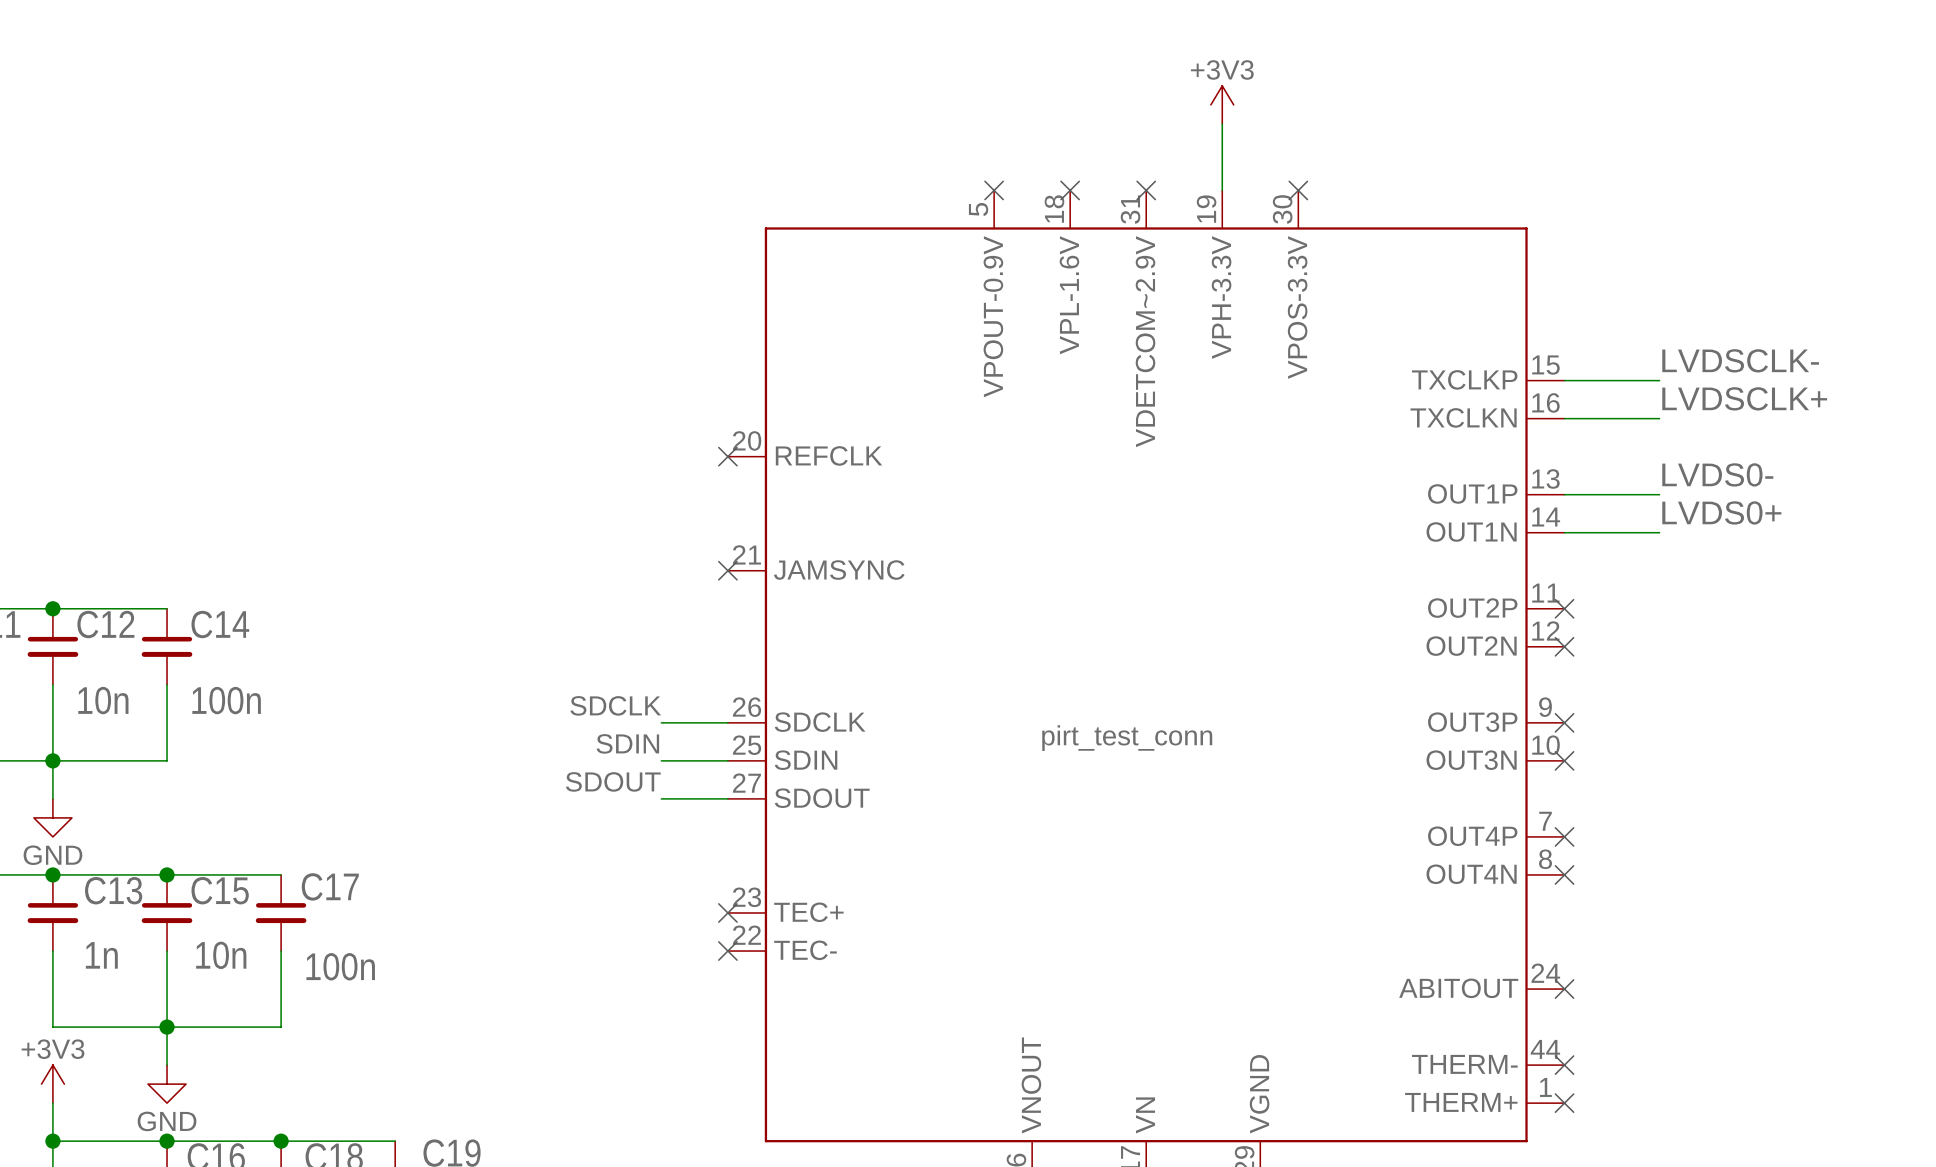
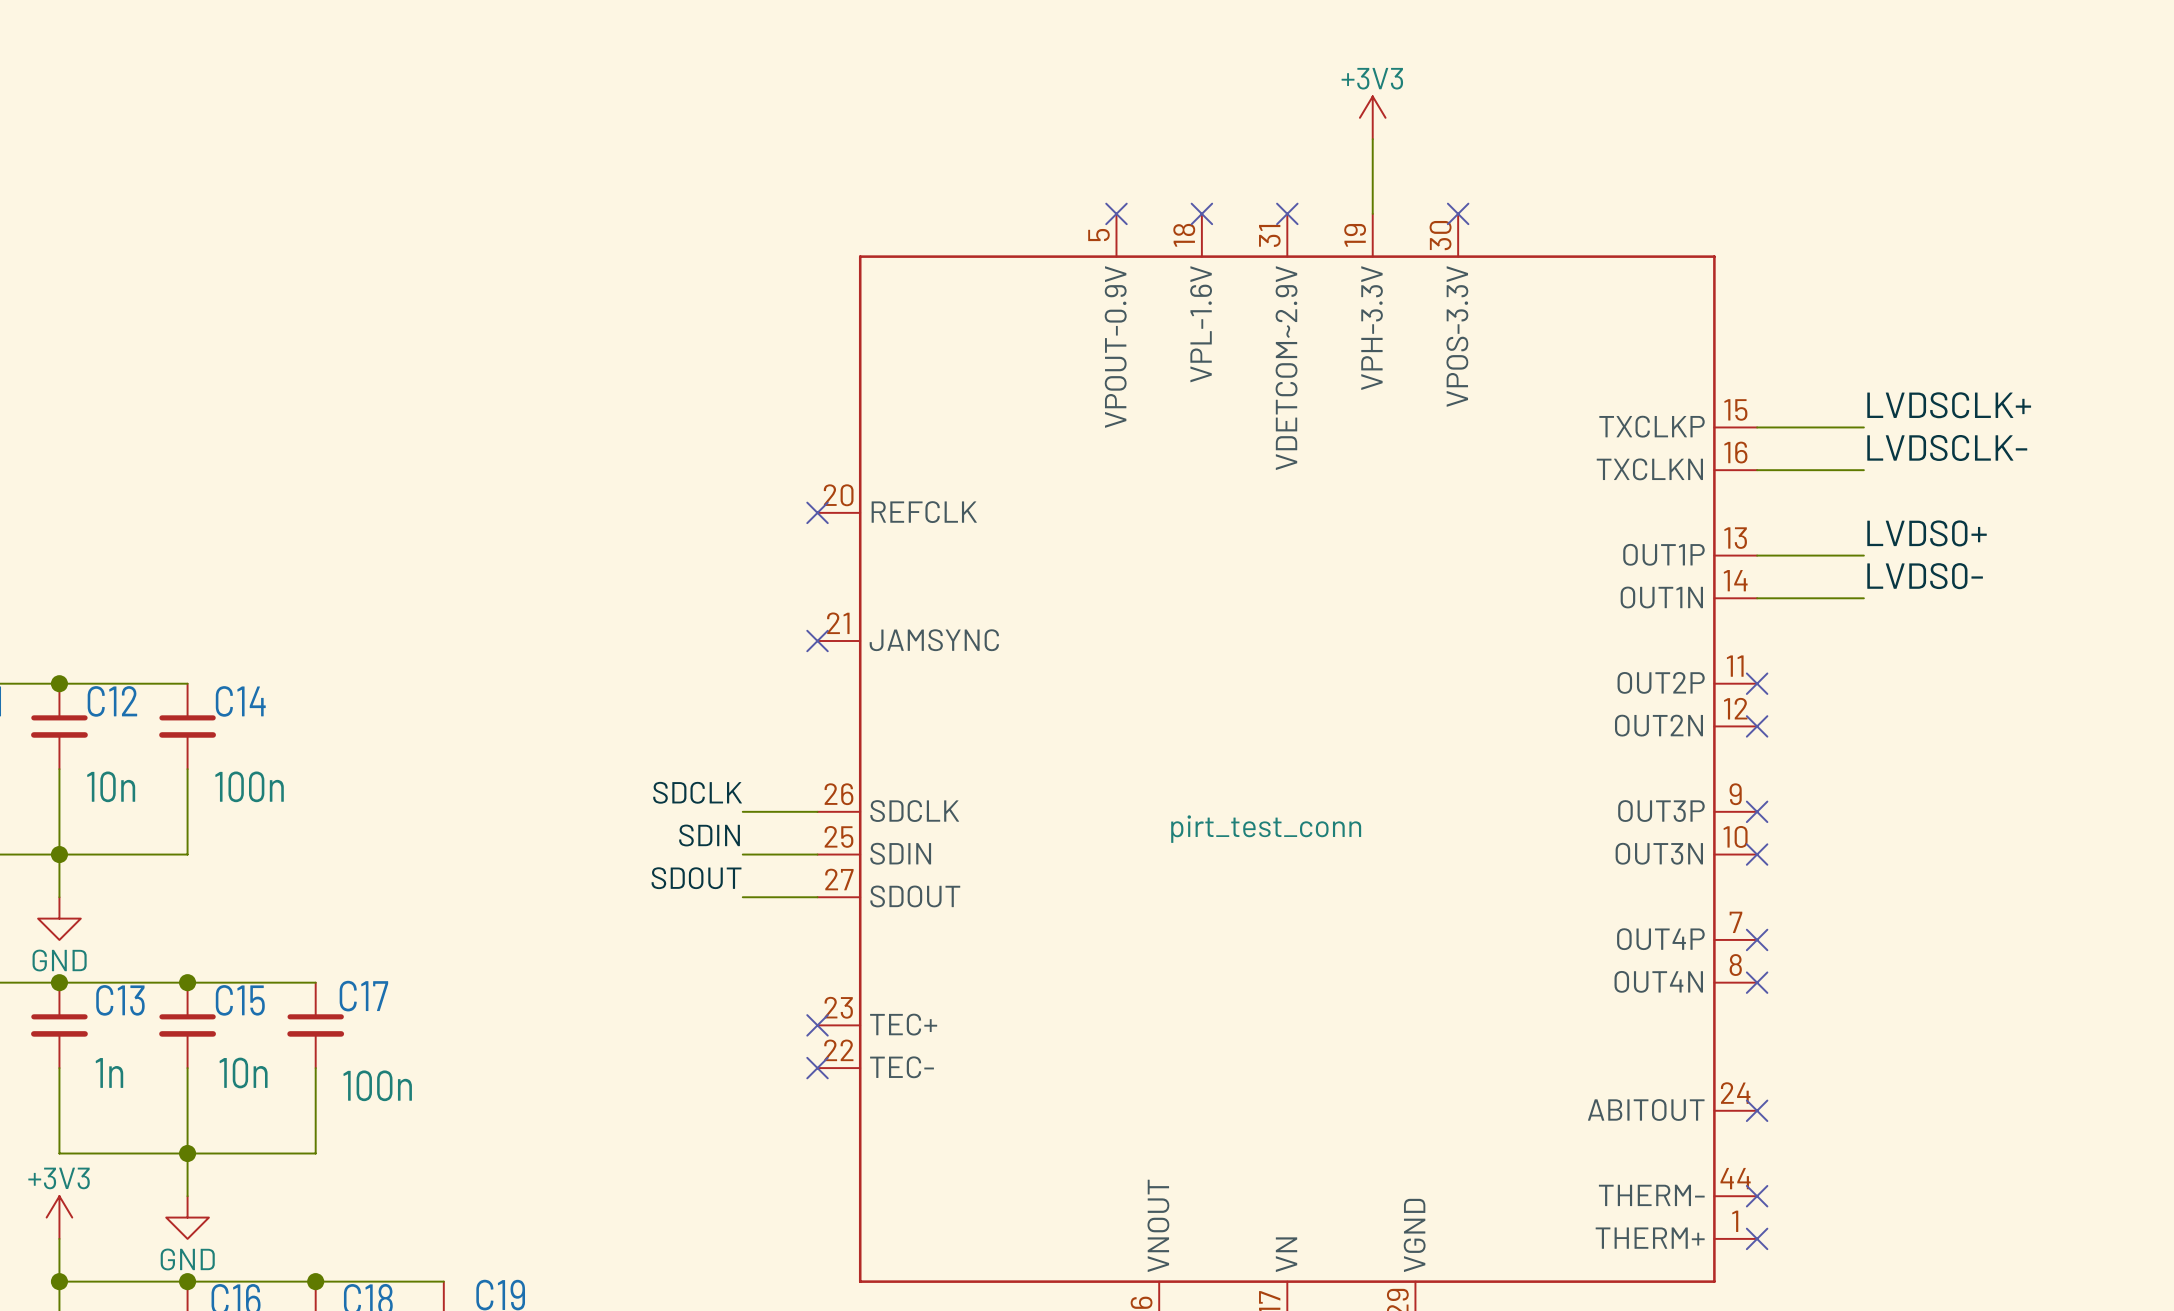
label: LVDSCLK- (1740, 360) -> LVDSCLK+ (1949, 405)
label: LVDSCLK+ (1744, 398) -> LVDSCLK- (1947, 447)
label: LVDS0- (1717, 474) -> LVDS0+ (1927, 533)
label: LVDS0+ (1721, 512) -> LVDS0- (1925, 576)

